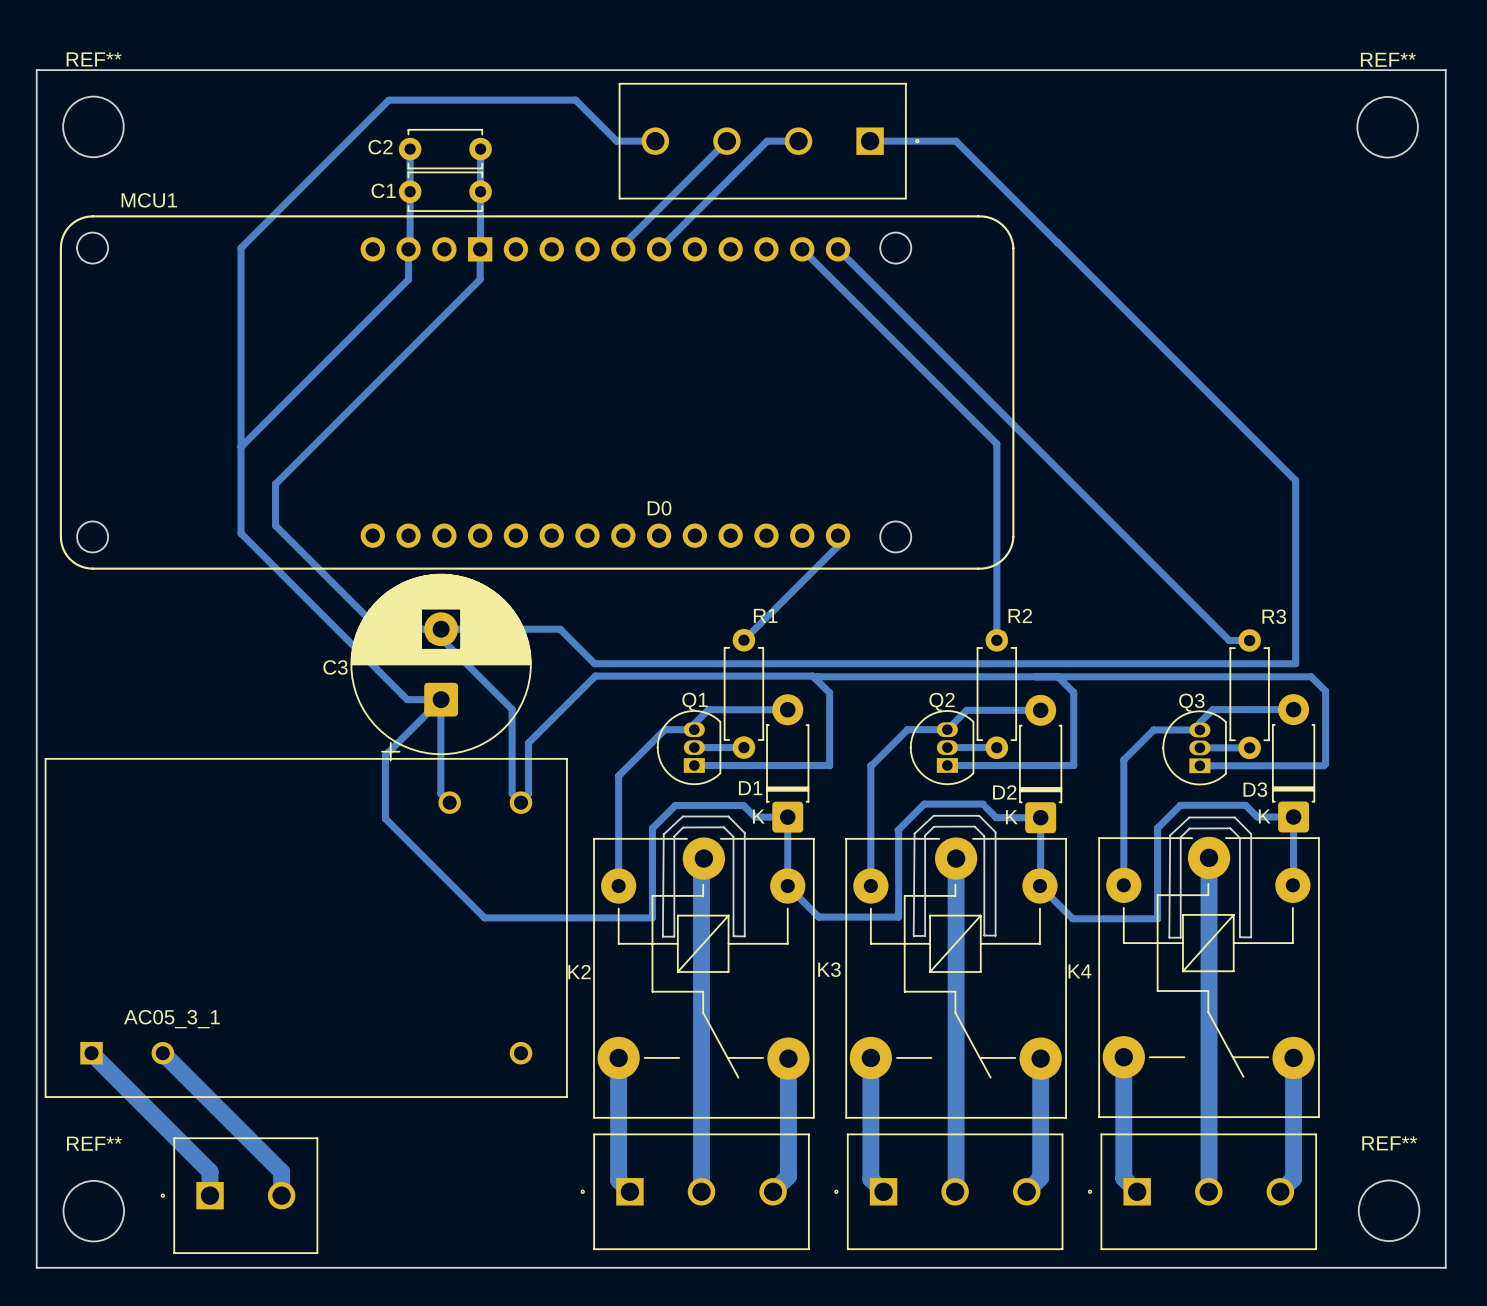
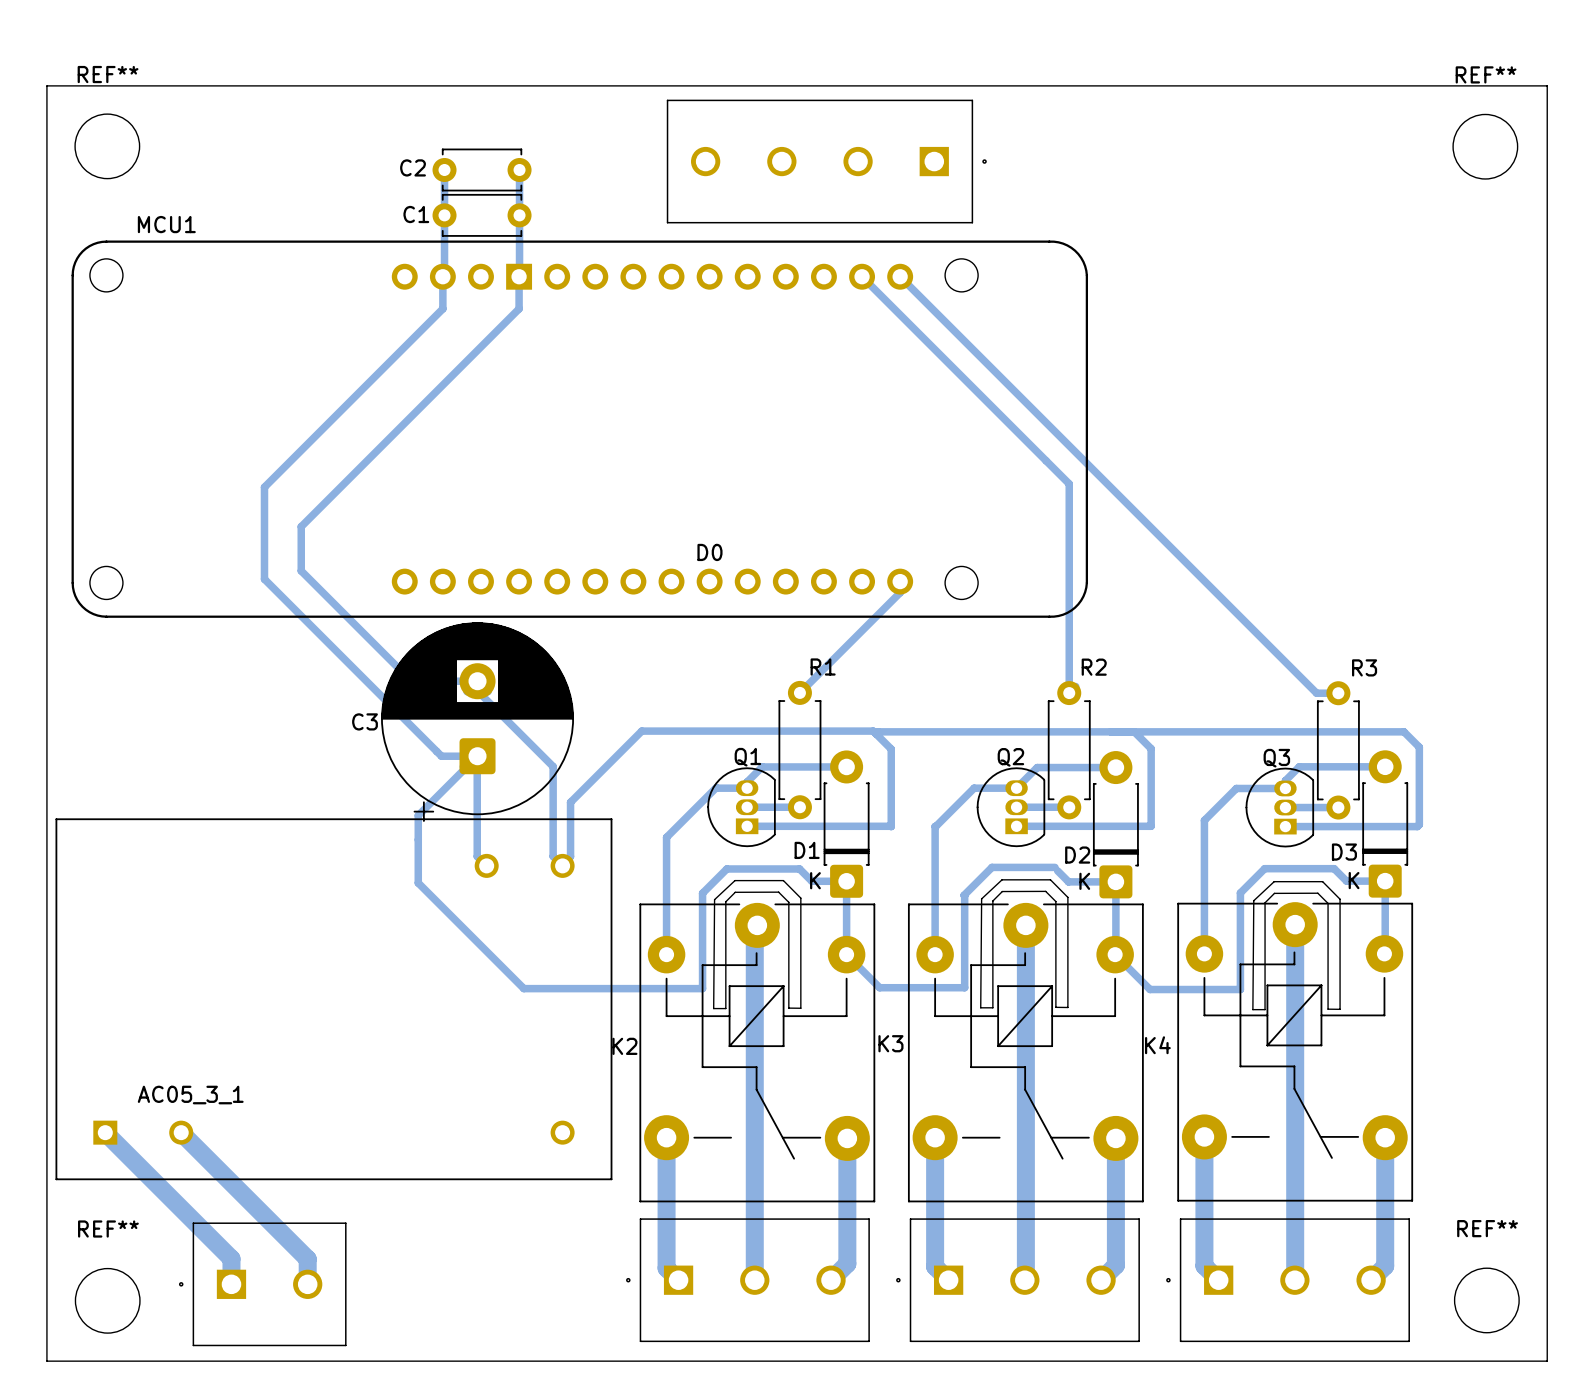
bottom track: (655, 141) (616, 141) (575, 100) (388, 100) (241, 248) (241, 447) -> none
bottom track: (726, 141) (623, 244) -> none
bottom track: (797, 141) (767, 141) (659, 249) -> none
bottom track: (870, 141) (955, 141) (1295, 480) (1295, 663) (594, 663) (560, 629) (441, 629) -> none

